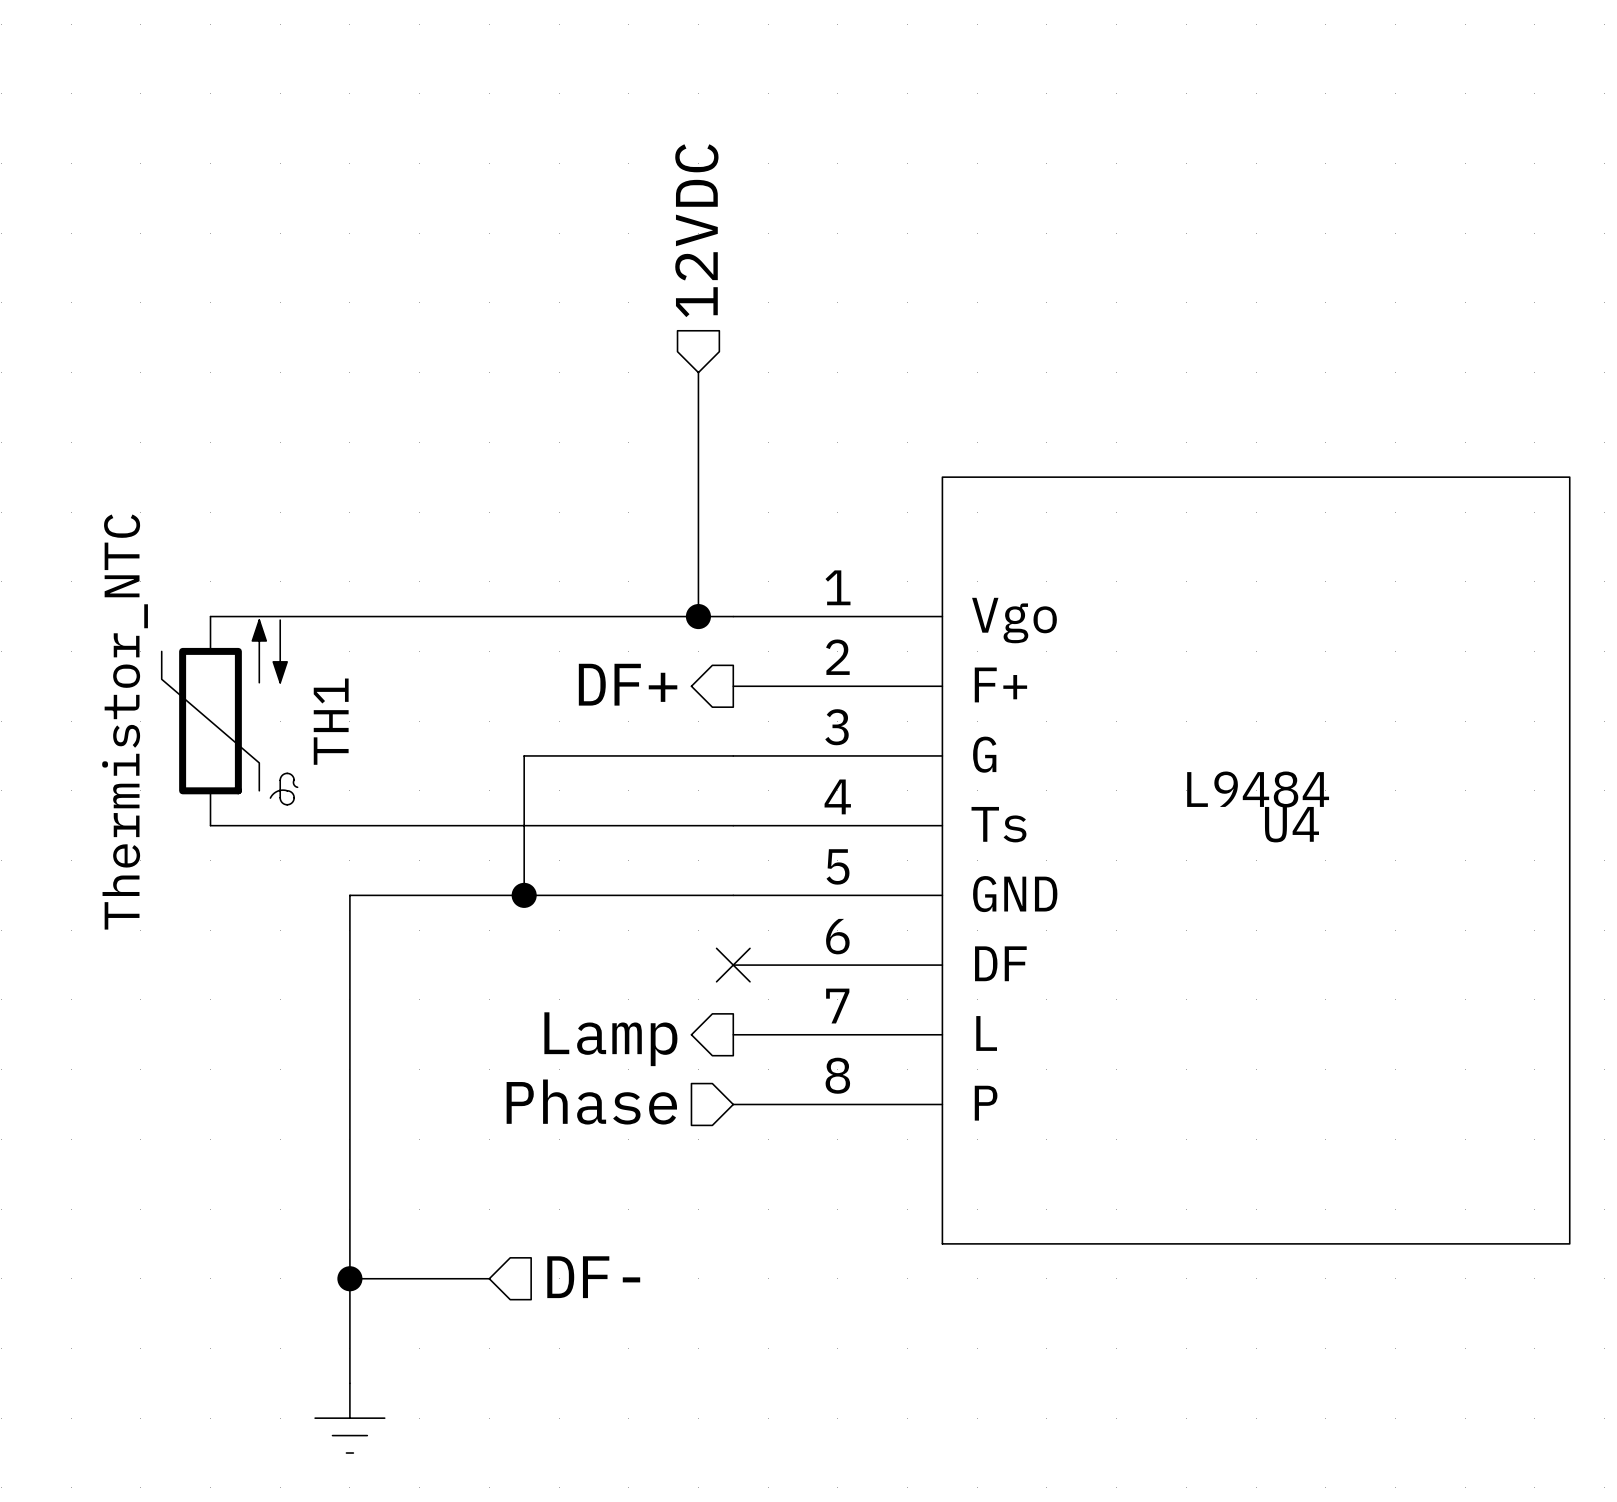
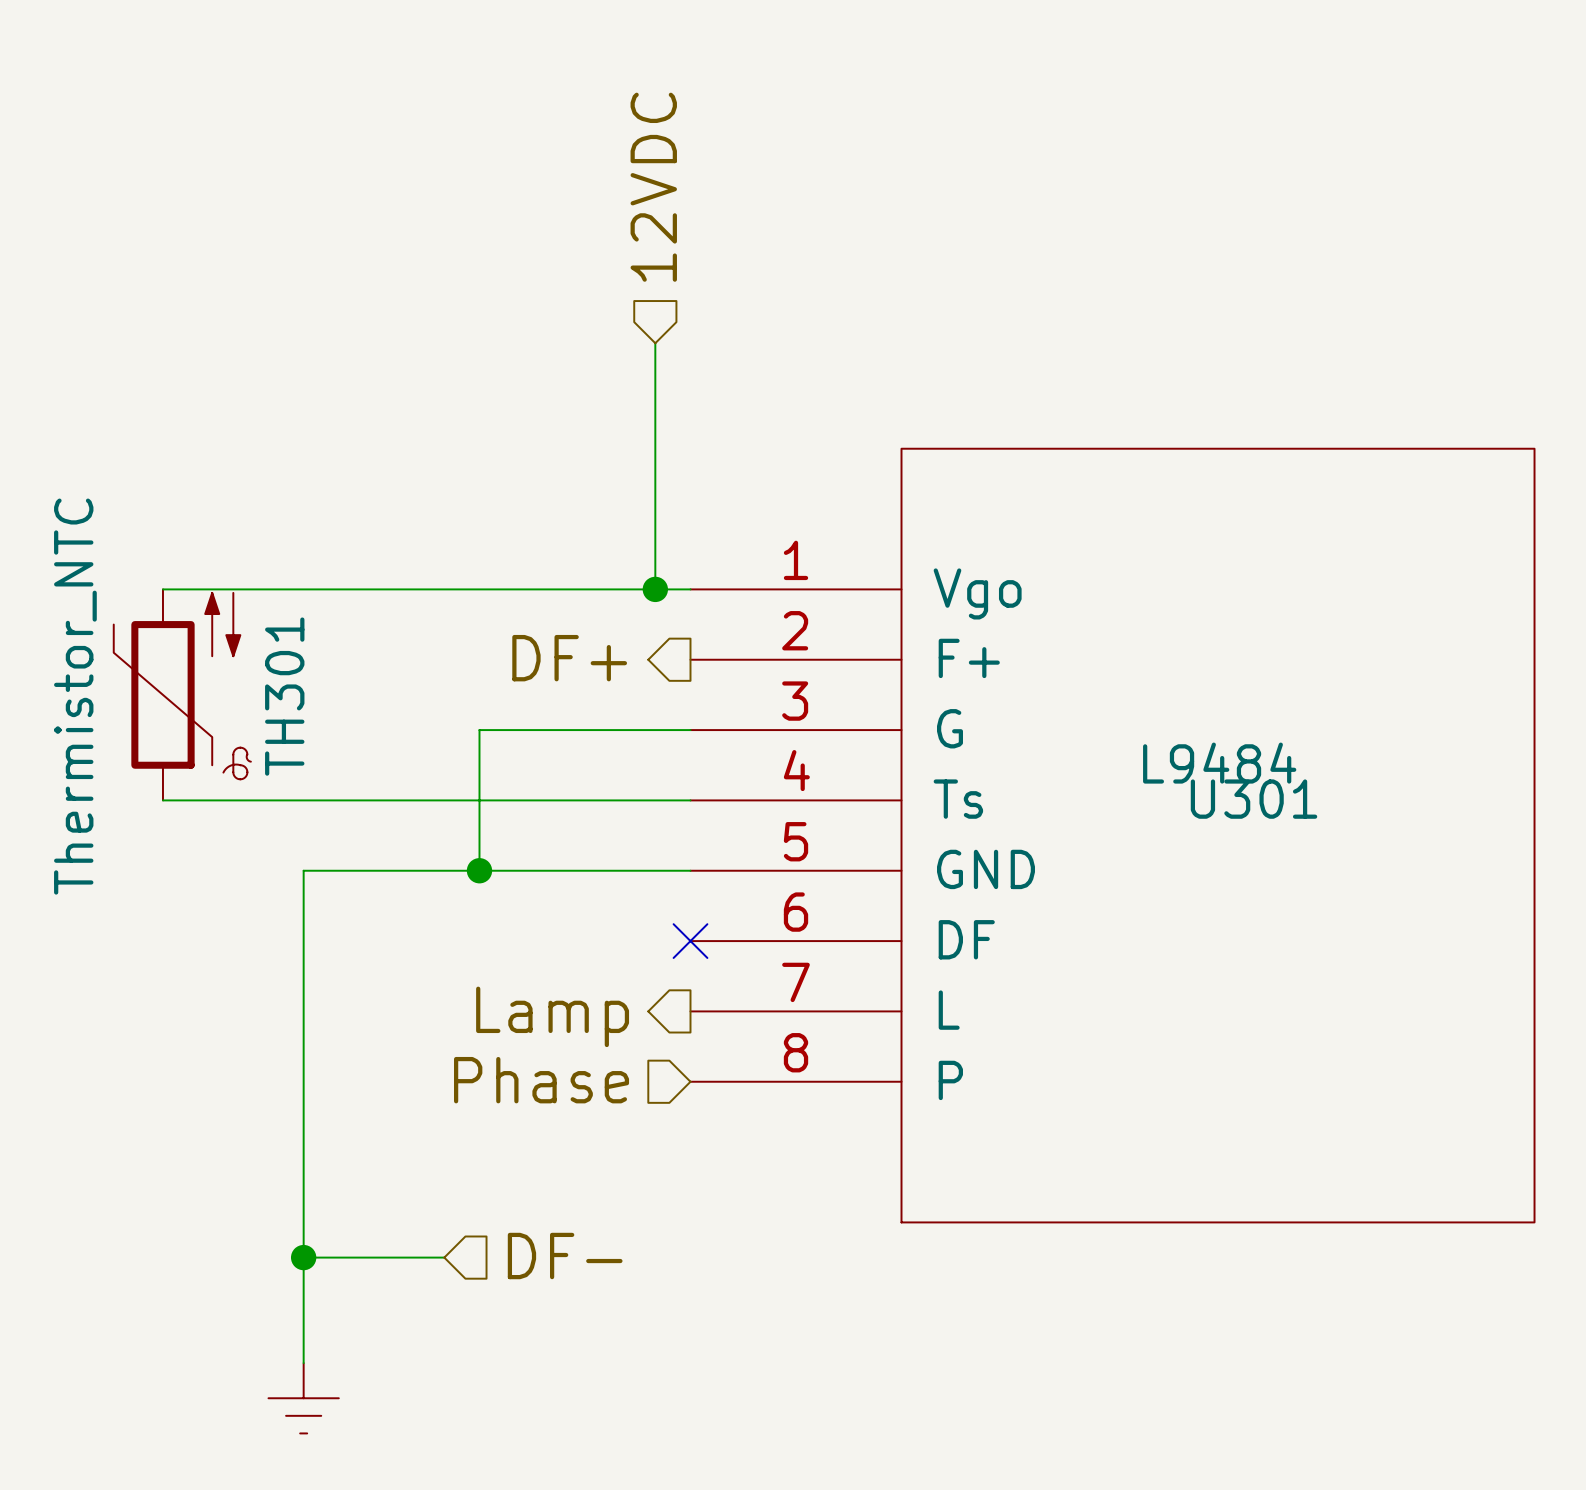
TH1 name: TH1 (331, 721) -> TH301 (284, 696)
U4 name: U4 (1291, 824) -> U301 (1254, 799)

